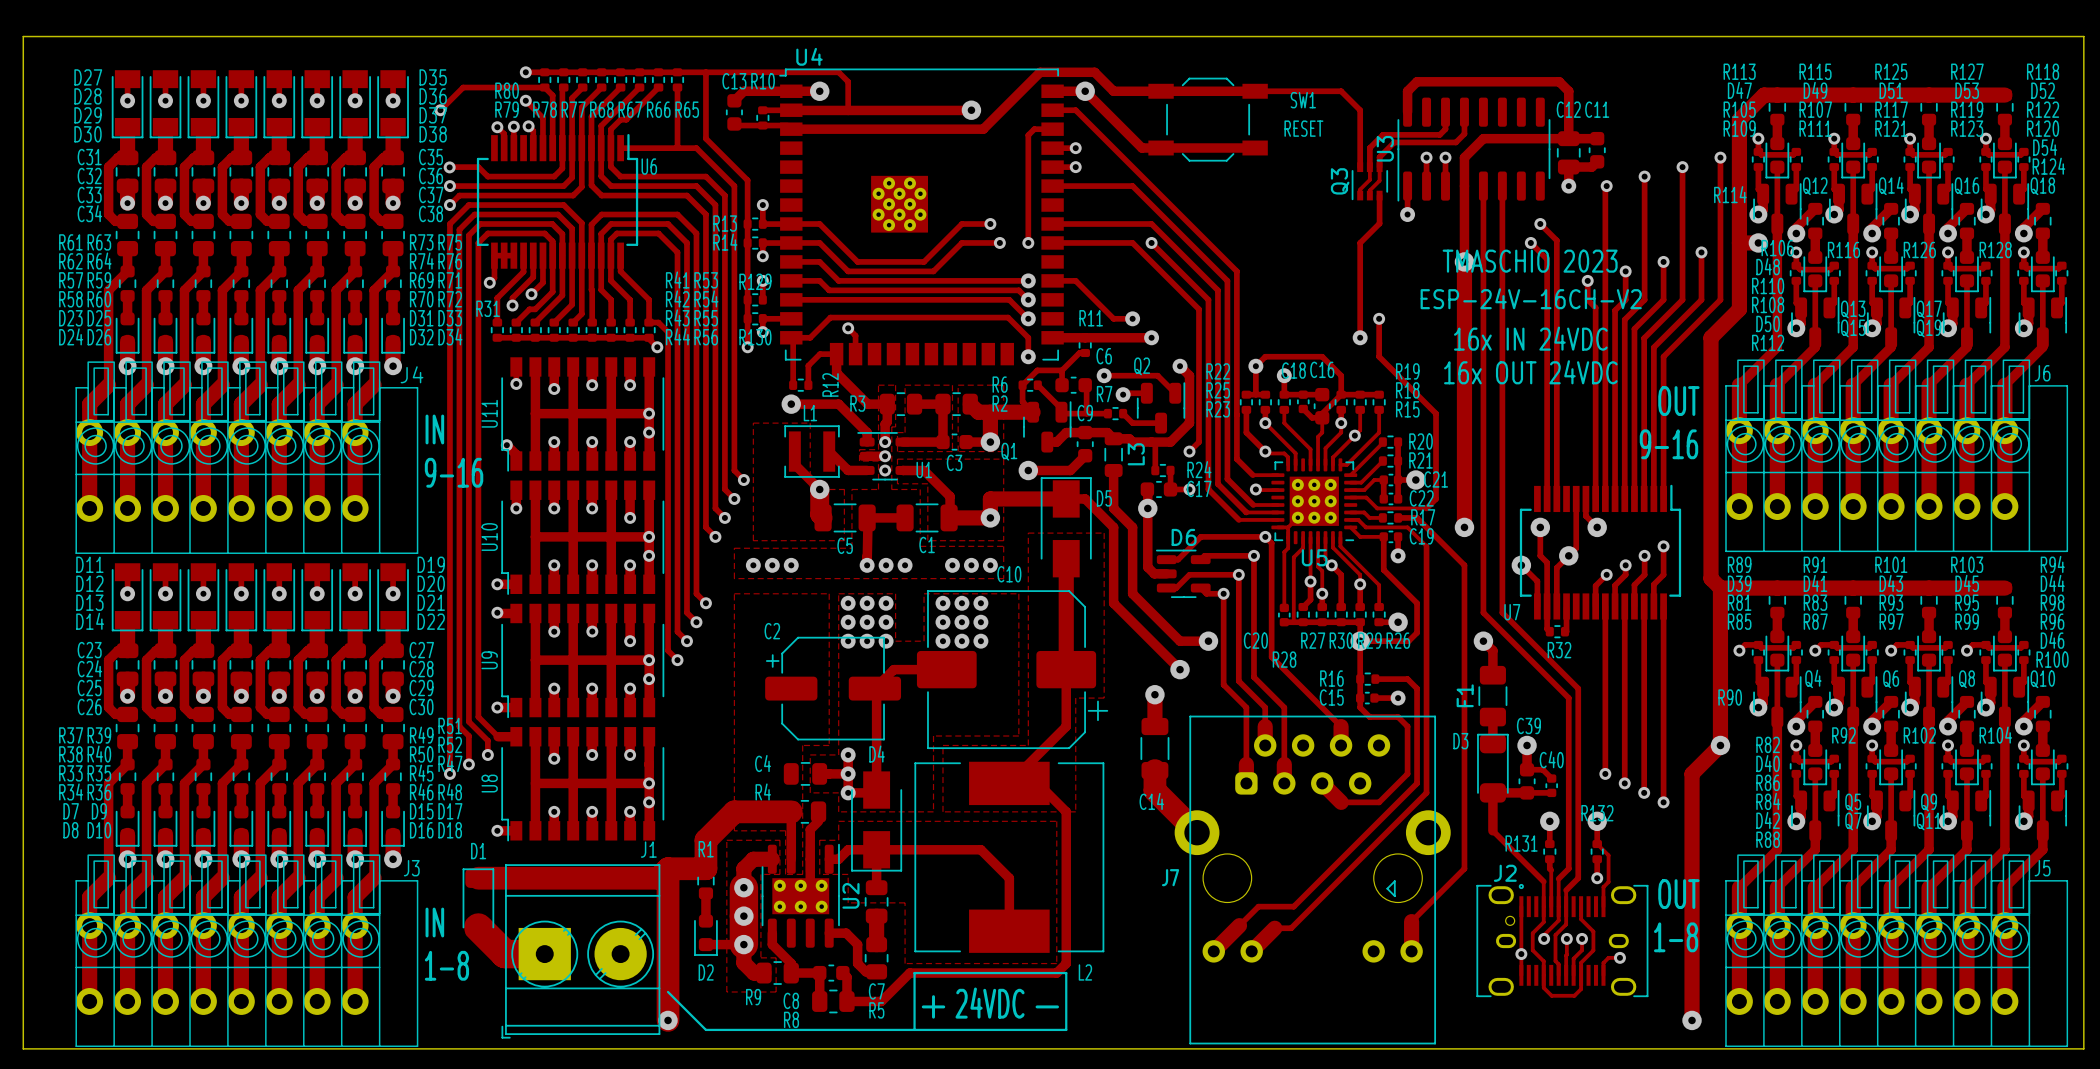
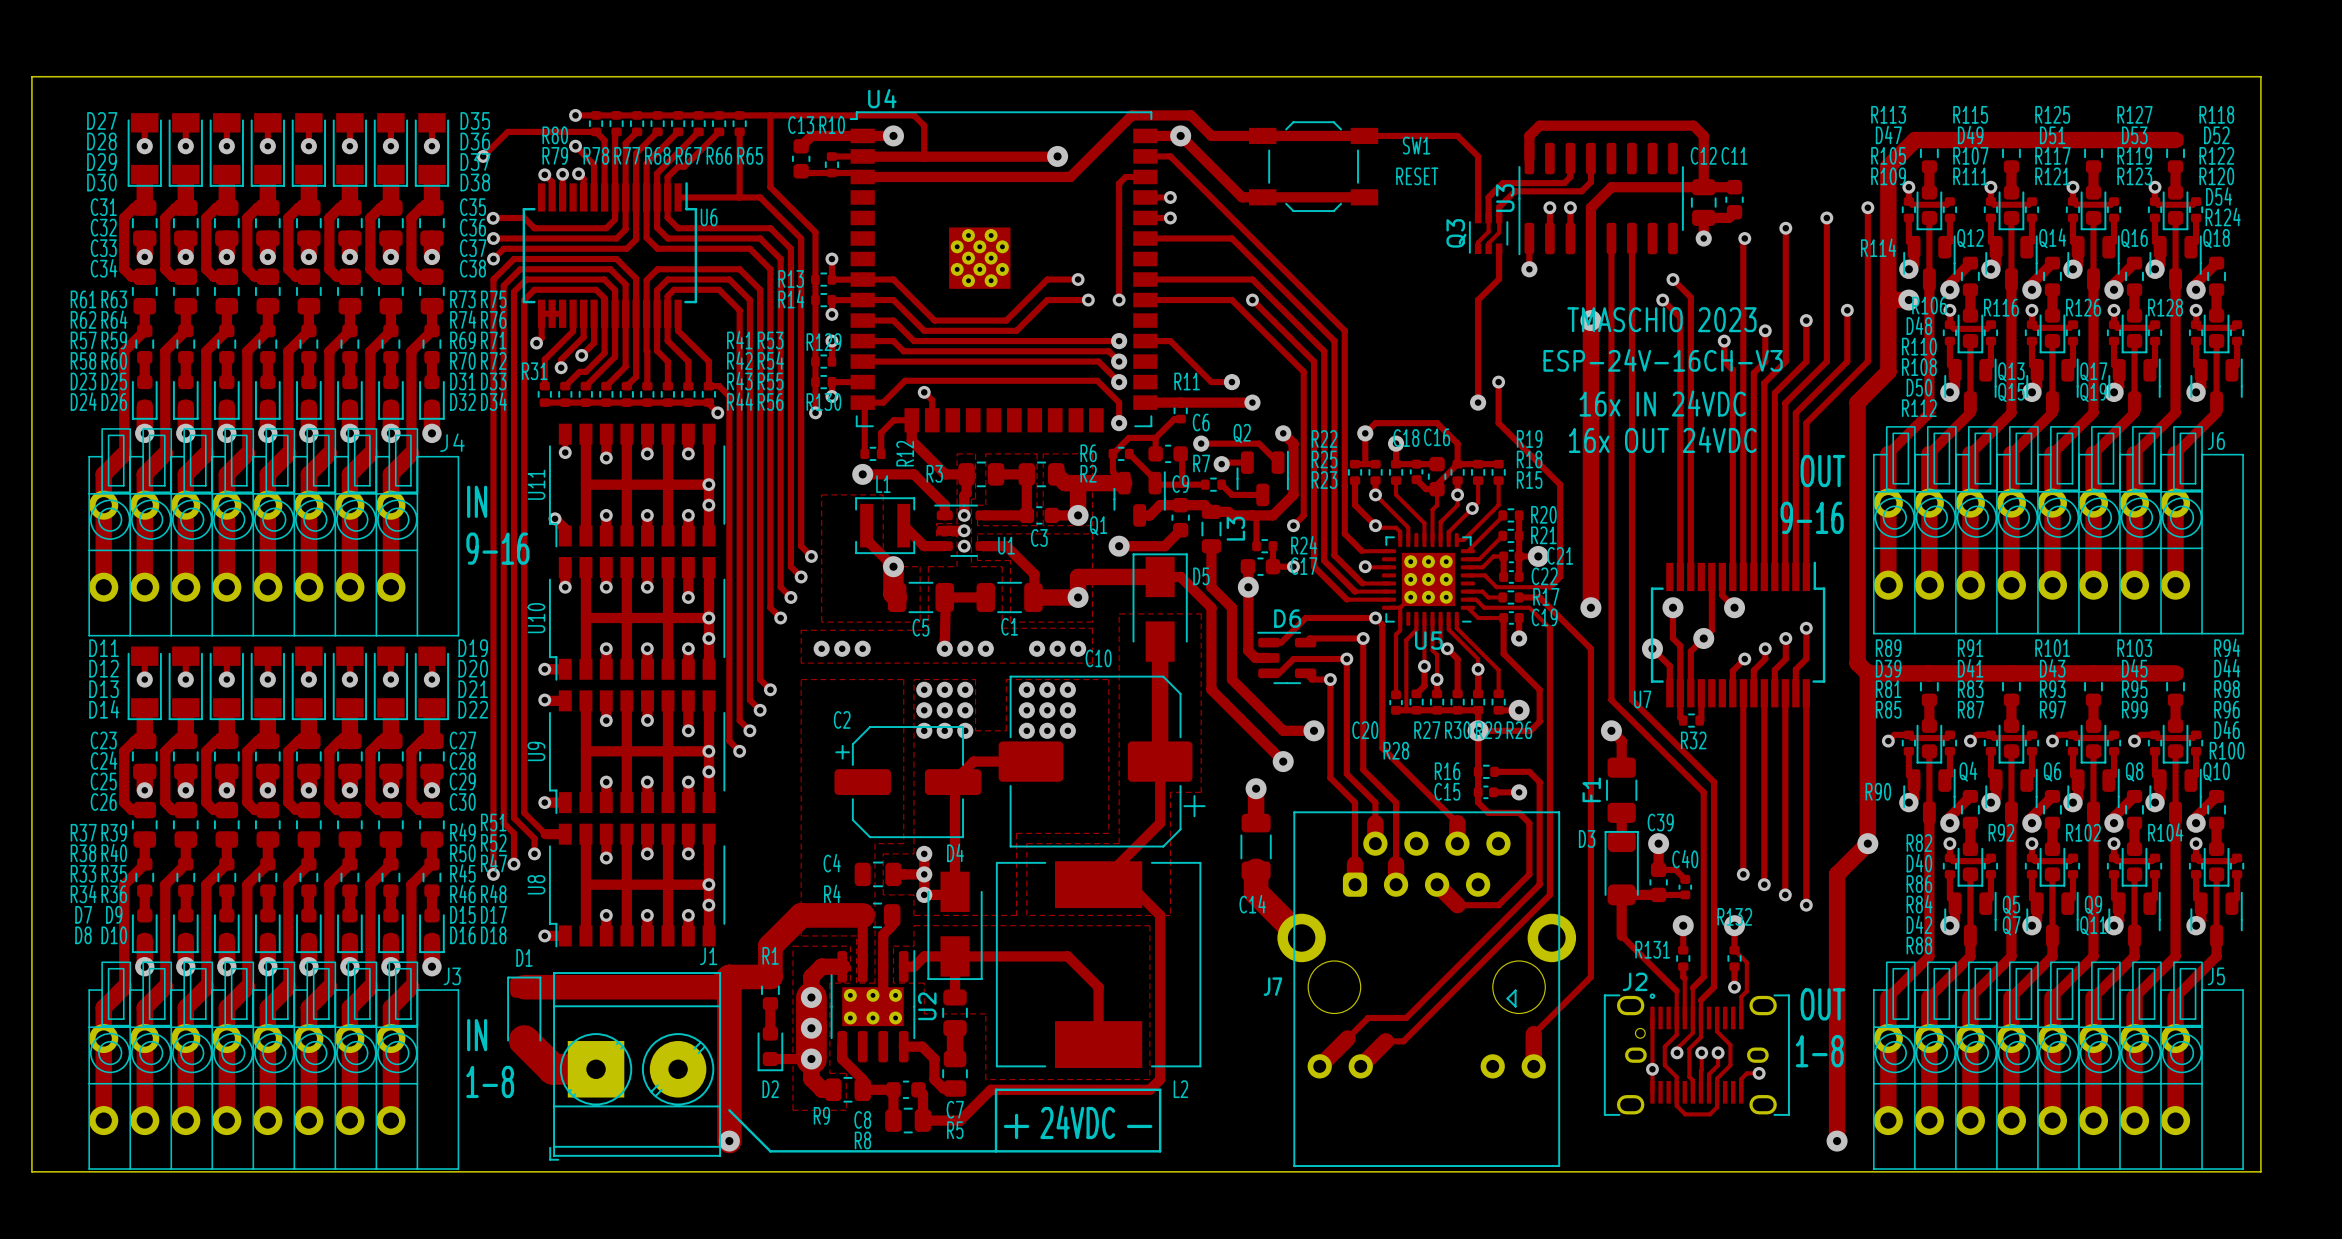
text: ESP-24V-16CH-V2 (1531, 298) -> ESP-24V-16CH-V3 (1663, 360)

